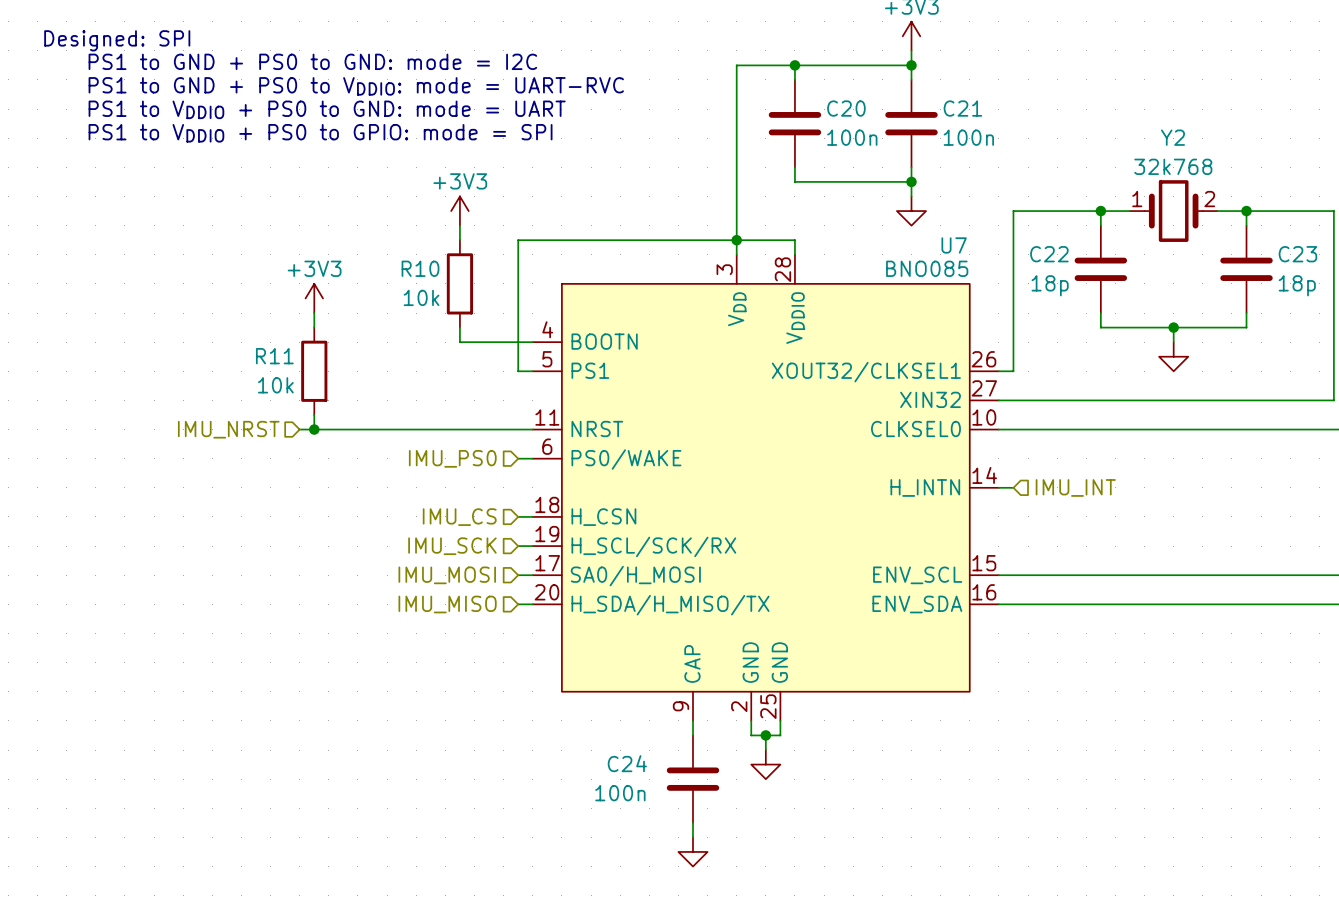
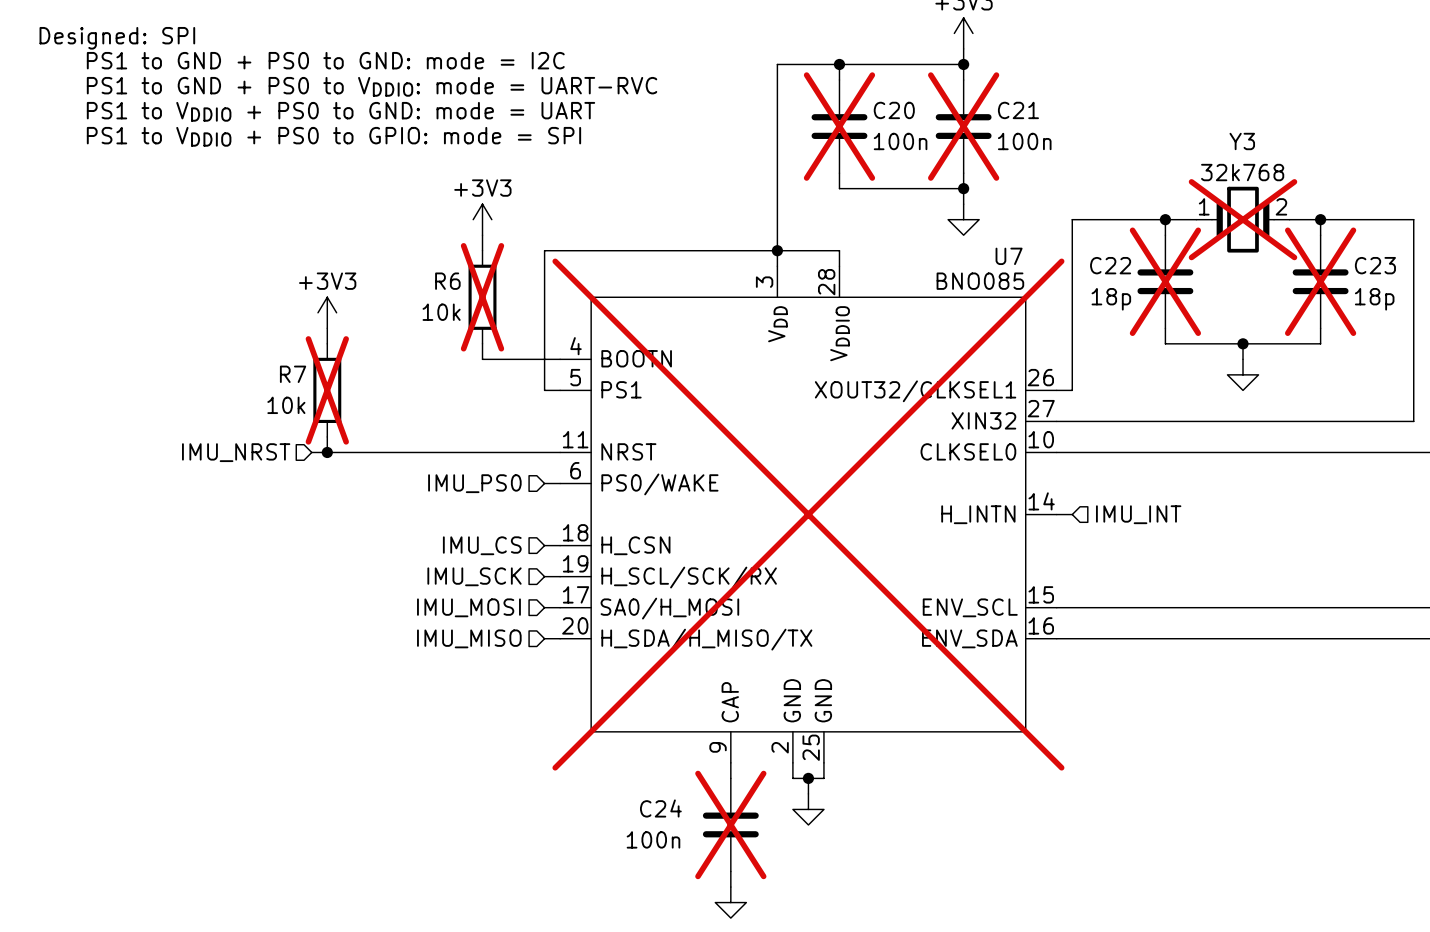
C20 do-not-place cross: none -> (839, 126)
C21 do-not-place cross: none -> (963, 126)
Y2 name: Y2 (1172, 137) -> Y3 (1242, 141)
Y2 do-not-place cross: none -> (1243, 219)
R10 name: R10 (420, 268) -> R6 (447, 281)
C22 do-not-place cross: none -> (1165, 281)
C23 do-not-place cross: none -> (1320, 281)
R10 do-not-place cross: none -> (482, 297)
R11 name: R11 (274, 356) -> R7 (293, 374)
R11 do-not-place cross: none -> (327, 390)
U7 do-not-place cross: none -> (808, 514)
C24 do-not-place cross: none -> (730, 824)

